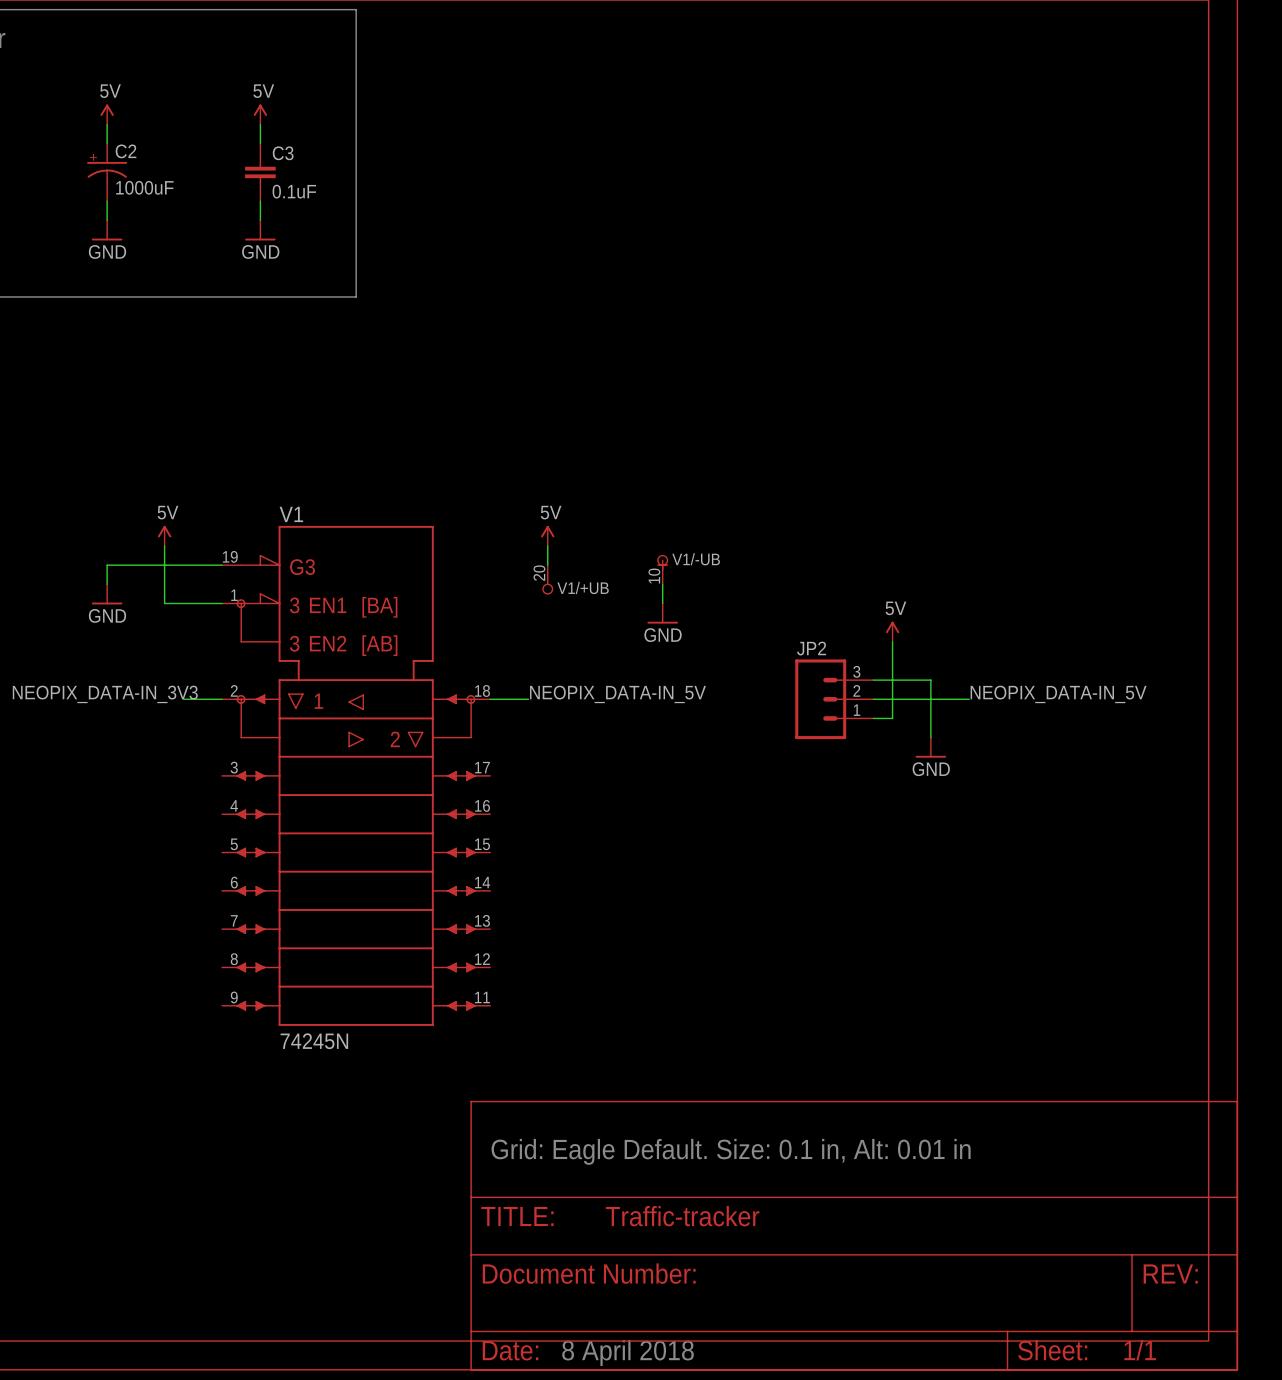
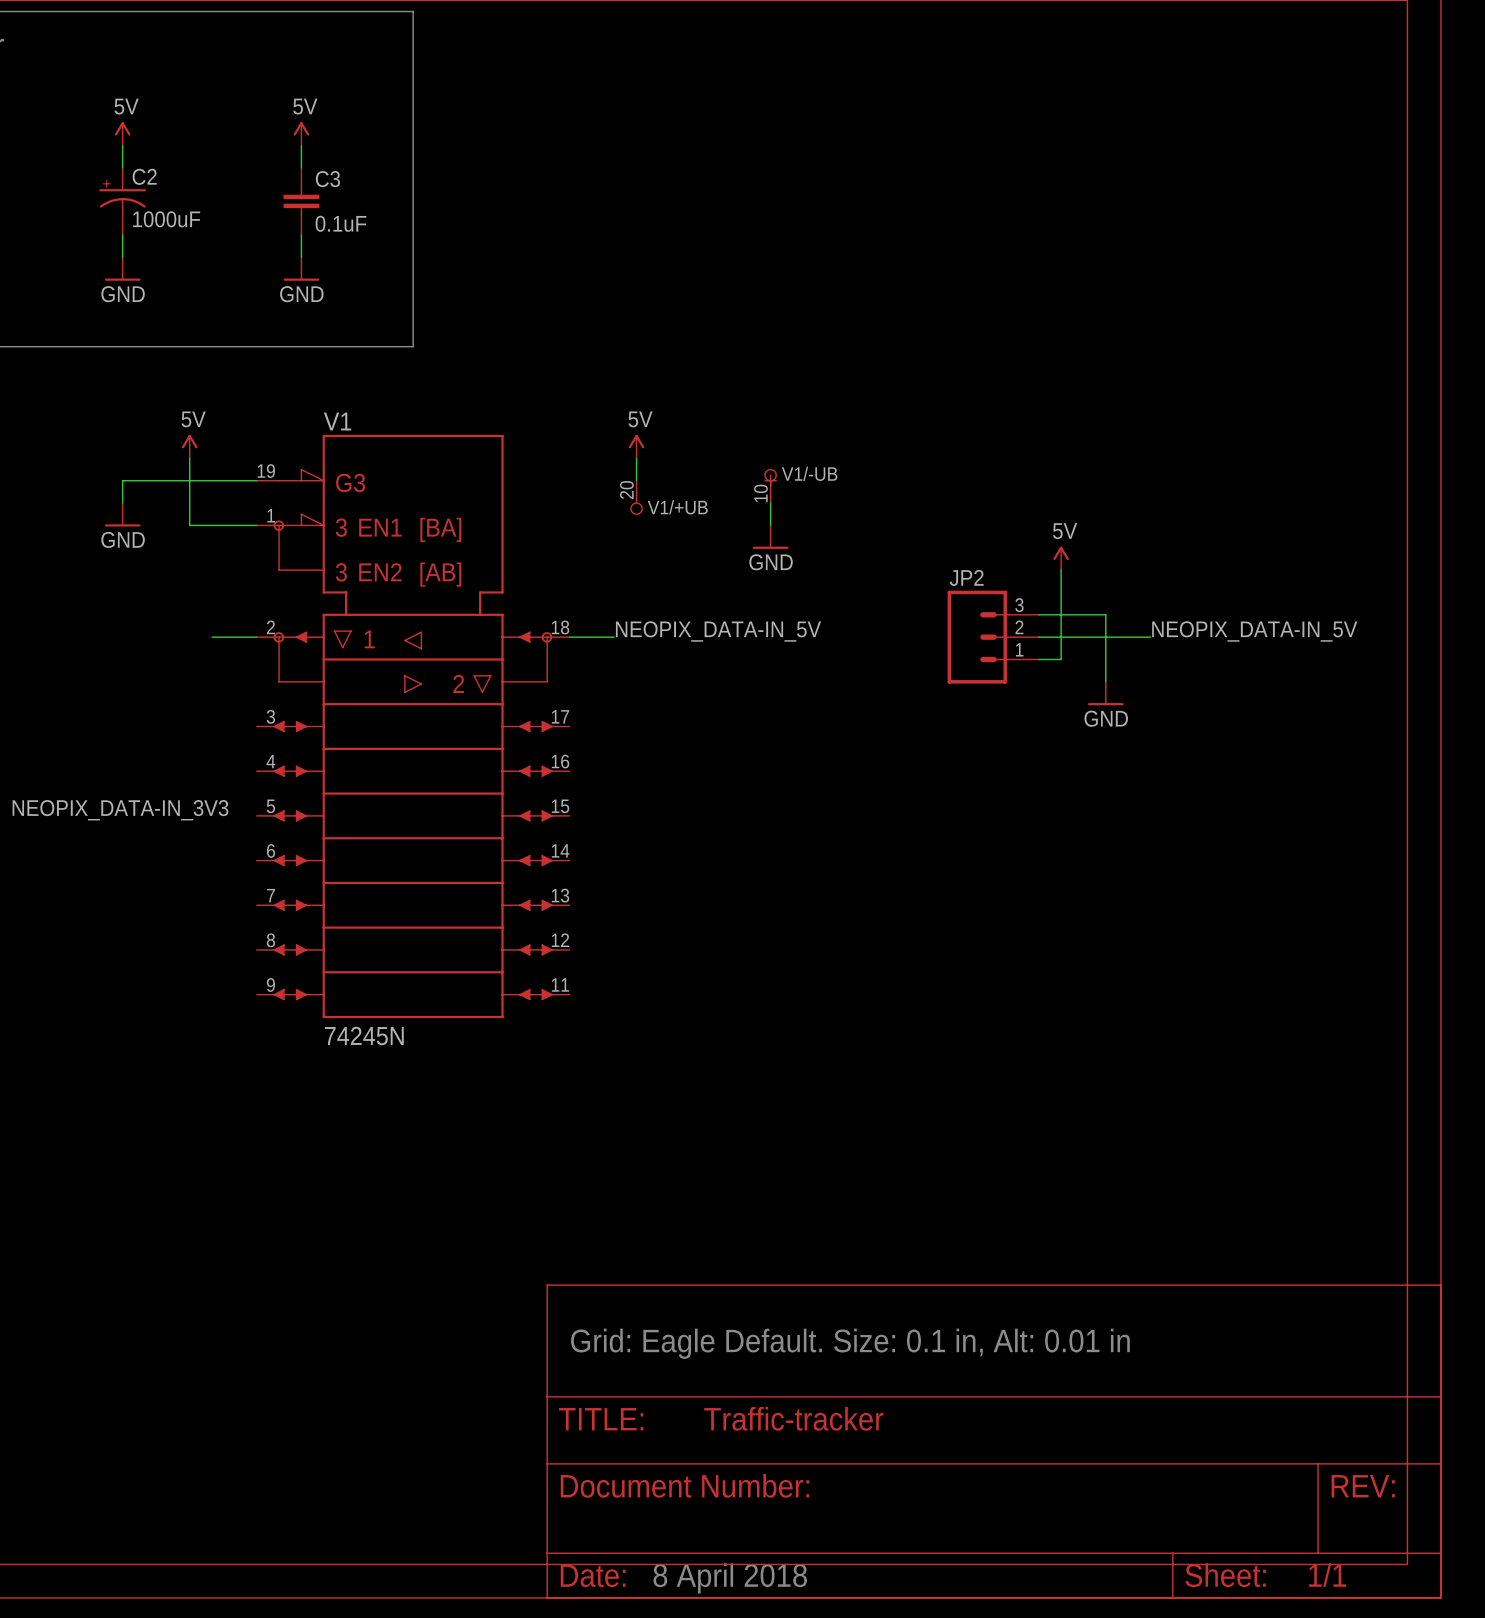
power symbol: none -> GND (770, 537)
power symbol position: 5V (164, 535) -> 5V (189, 446)
power symbol position: 5V (547, 535) -> 5V (636, 446)
wire: (164, 546) (164, 603) (222, 603) -> (189, 458) (189, 525) (256, 525)
wire: (547, 546) (547, 565) -> (636, 458) (636, 480)
wire: (222, 565) (107, 565) (107, 584) -> (256, 480) (122, 480) (122, 503)
V1/-UB position: (662, 569) -> (770, 485)
V1/+UB position: (547, 579) -> (636, 497)
wire: (662, 584) (662, 603) -> (770, 503) (770, 525)
power symbol position: GND (107, 594) -> GND (122, 514)
power symbol: none -> GND (1105, 693)
power symbol: GND (662, 613) -> none
power symbol position: 5V (892, 631) -> 5V (1061, 558)
wire: (892, 641) (892, 718) (873, 718) -> (1061, 570) (1061, 659) (1038, 659)
wire: (873, 680) (930, 680) (930, 737) -> (1038, 614) (1105, 614) (1105, 681)
label position: NEOPIX_DATA-IN_5V (617, 694) -> NEOPIX_DATA-IN_5V (718, 631)
label position: NEOPIX_DATA-IN_5V (1058, 694) -> NEOPIX_DATA-IN_5V (1254, 631)
wire: (183, 699) (222, 699) -> (212, 637) (256, 637)
wire: (490, 699) (528, 699) -> (569, 637) (614, 637)
JP2 position: (834, 699) -> (993, 637)
wire: (873, 699) (969, 699) -> (1038, 637) (1150, 637)
power symbol: GND (930, 747) -> none
V1 position: (356, 775) -> (413, 726)

